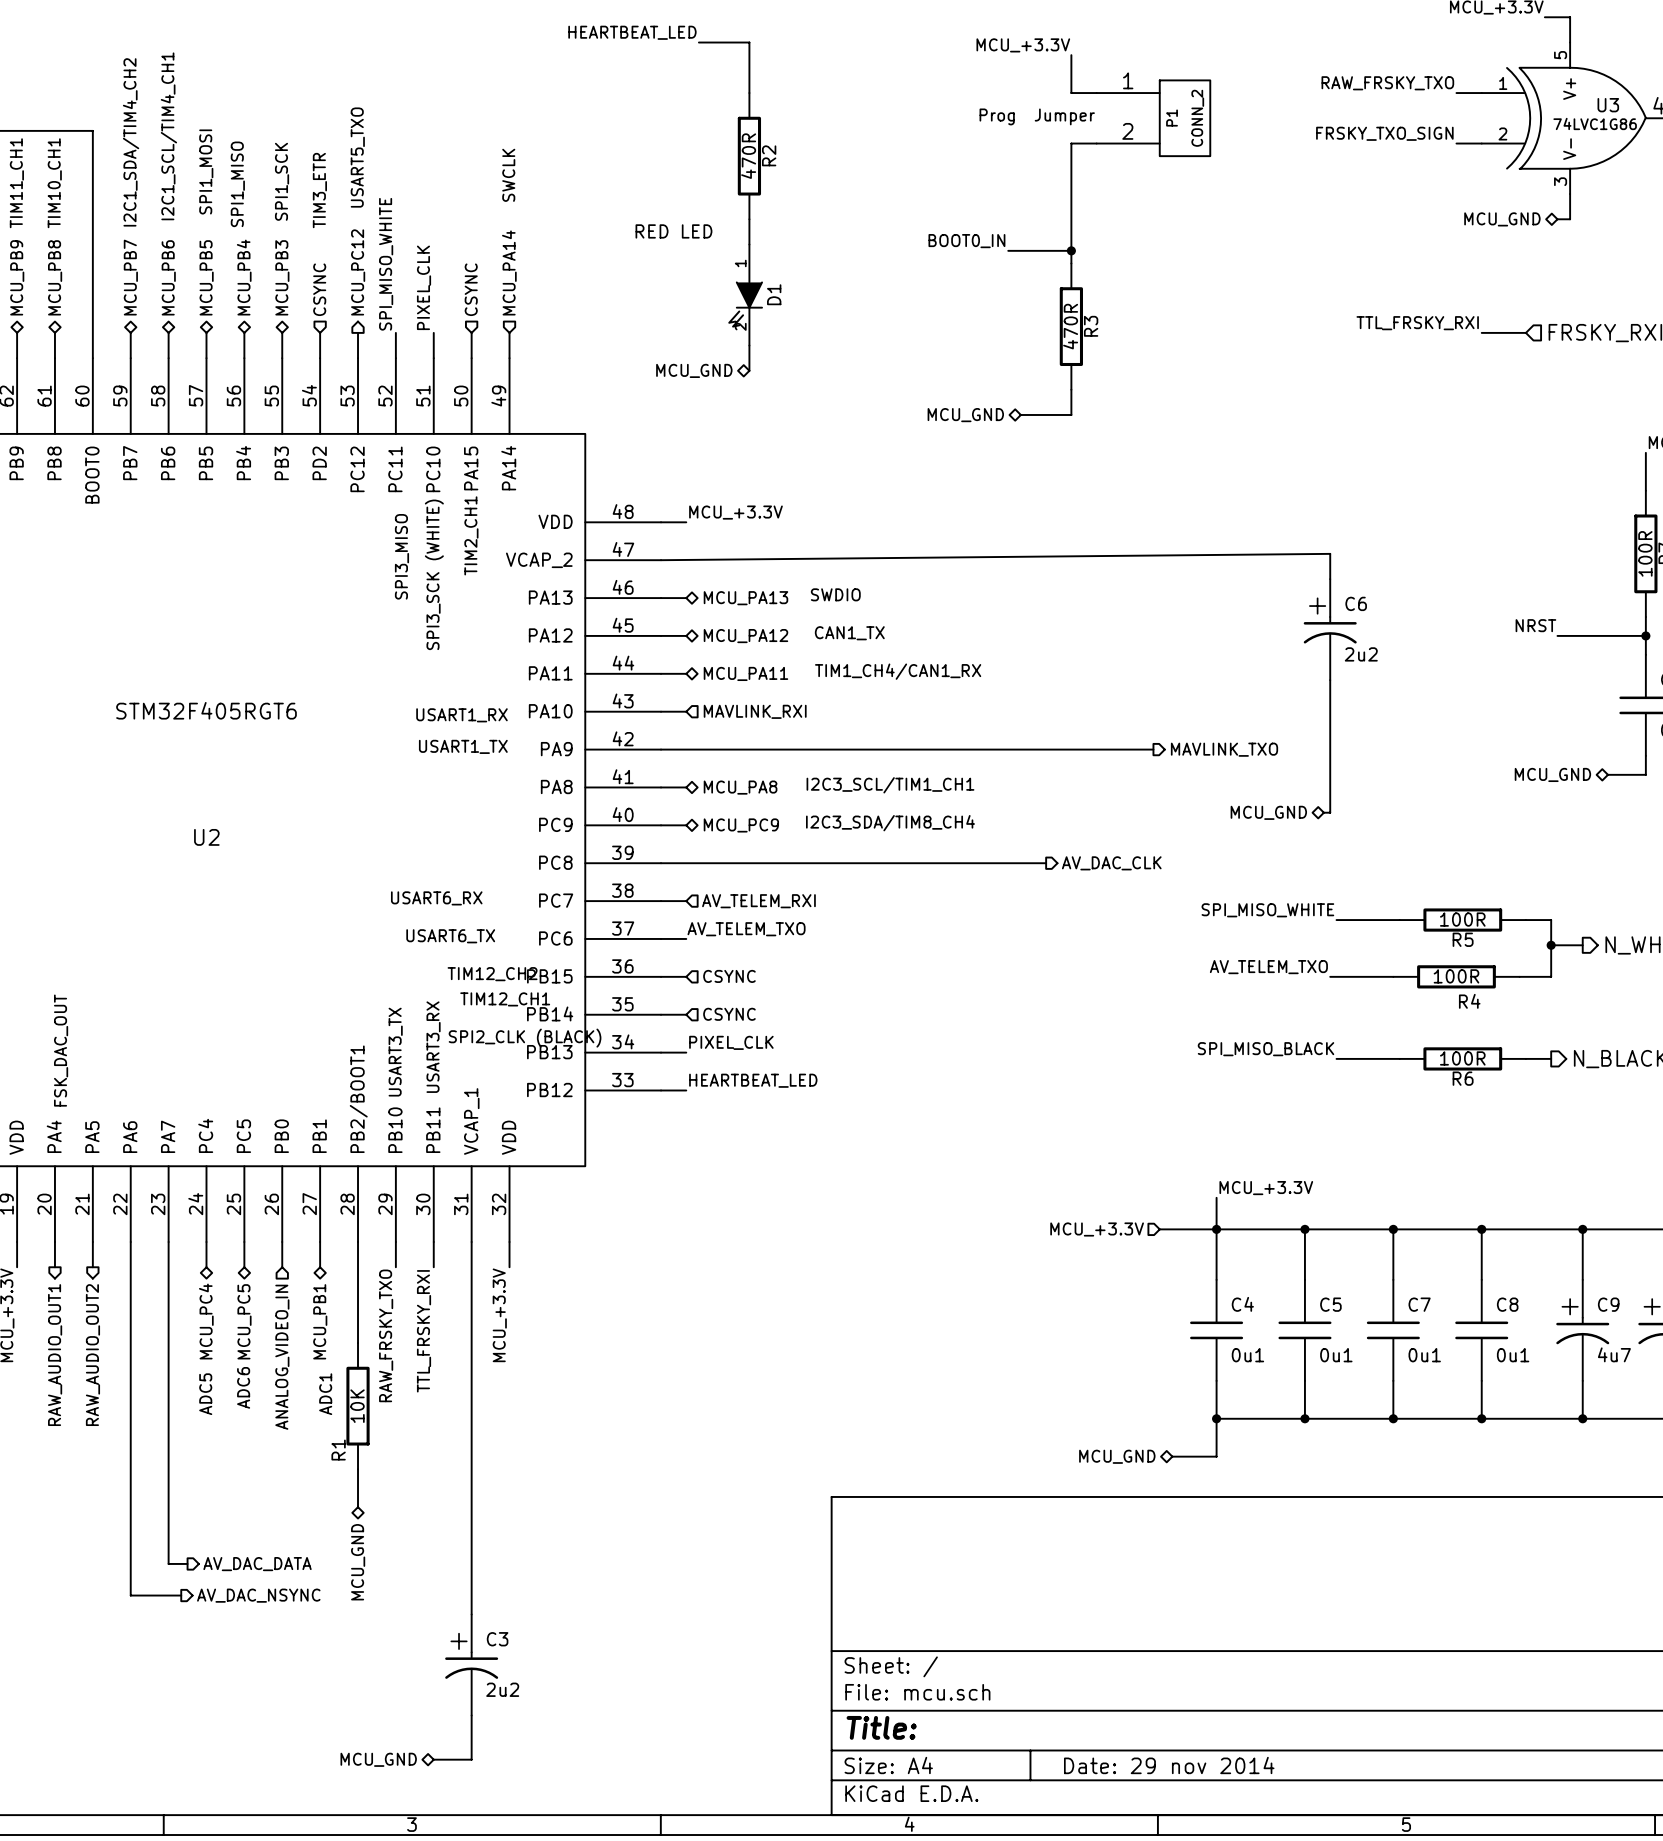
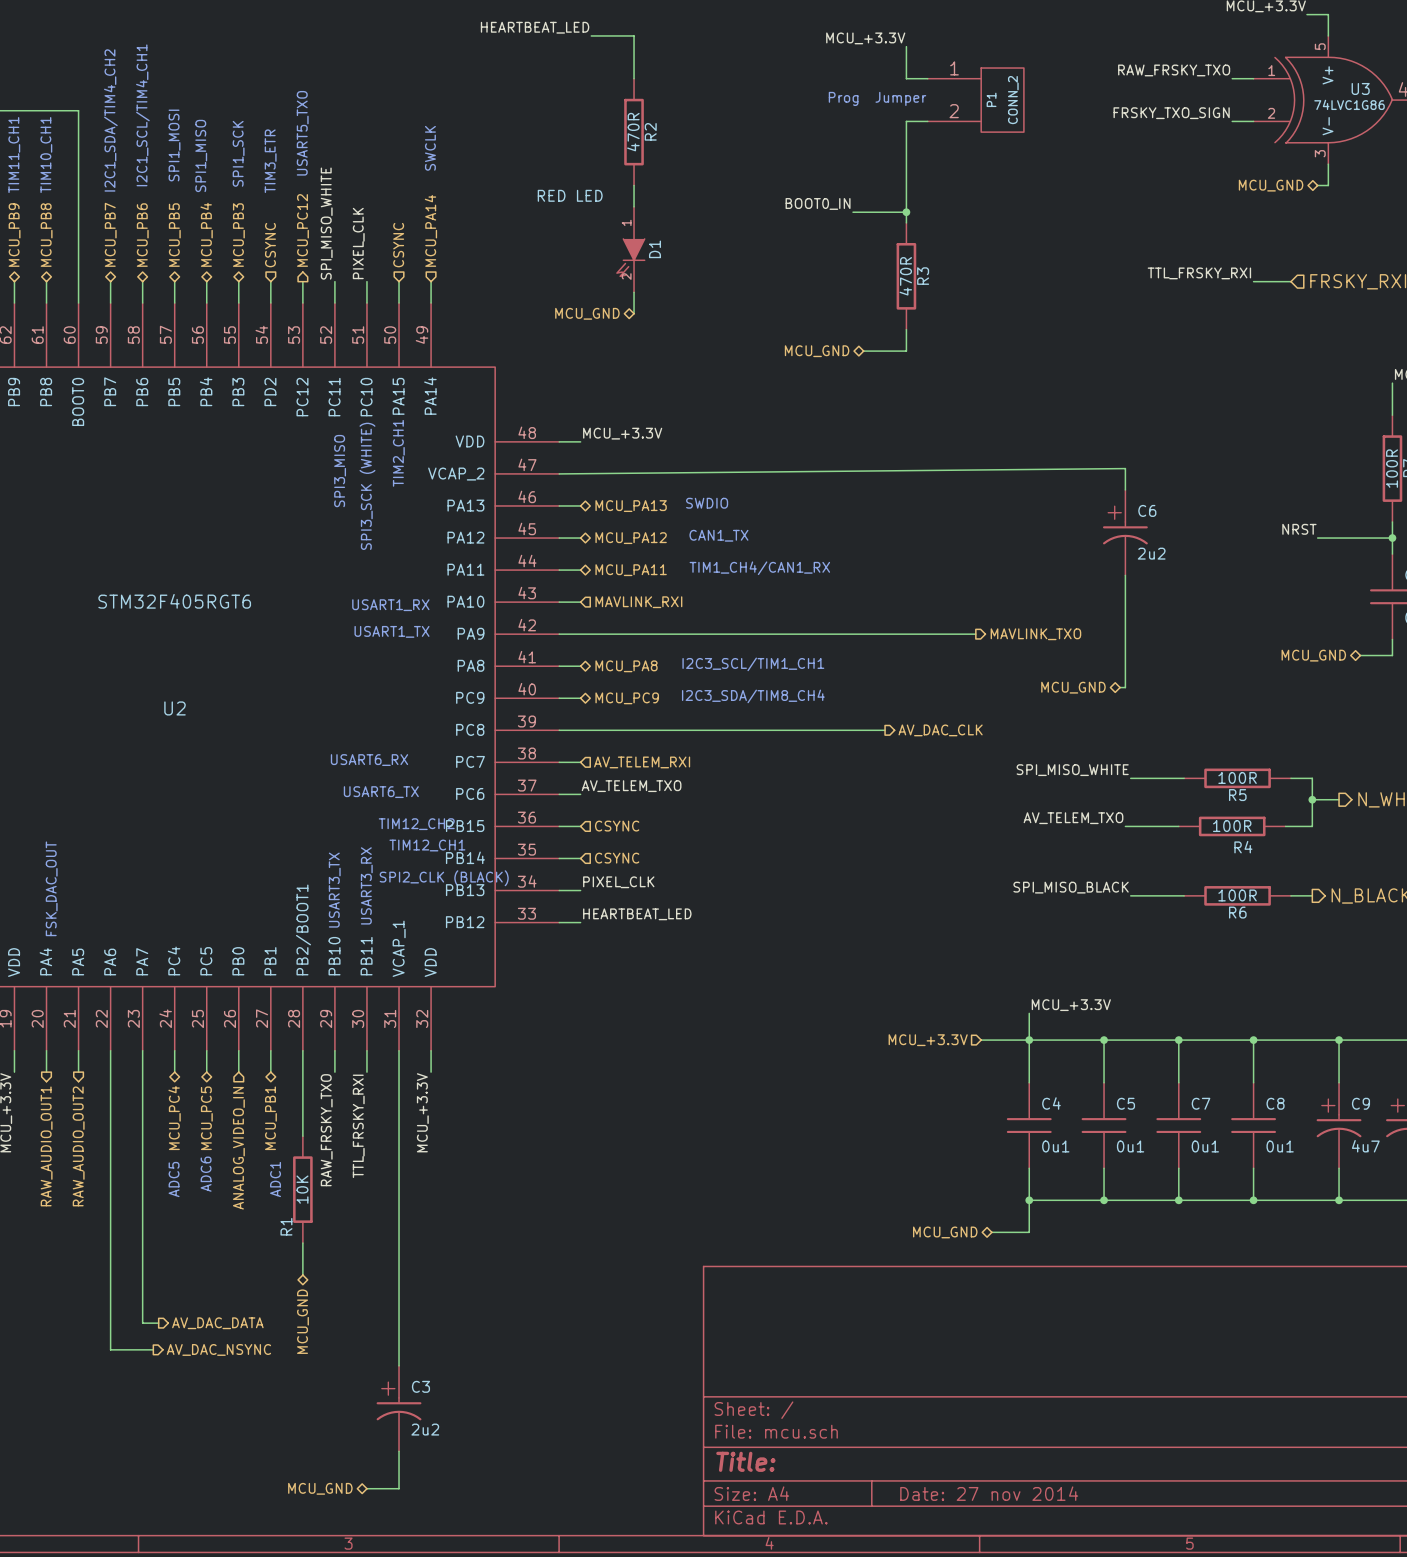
title block: Date: 29 nov 2014 (1169, 1765) -> Date: 27 nov 2014 (989, 1493)

